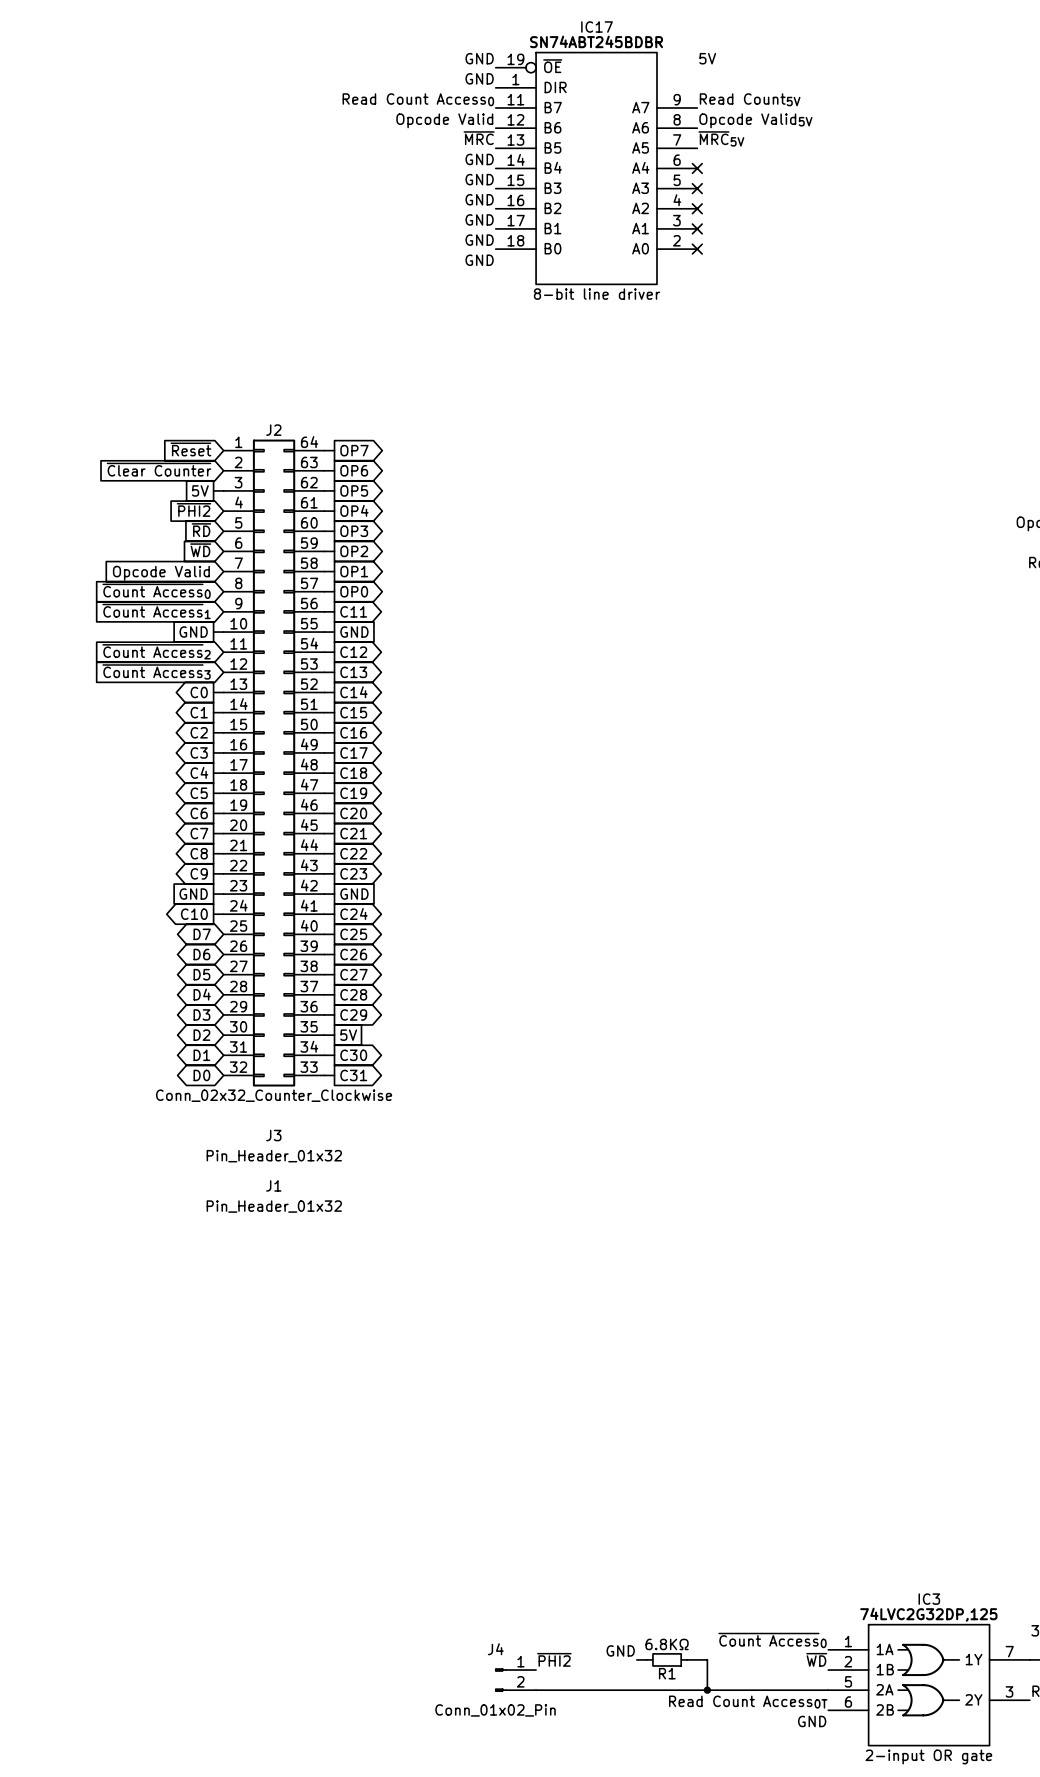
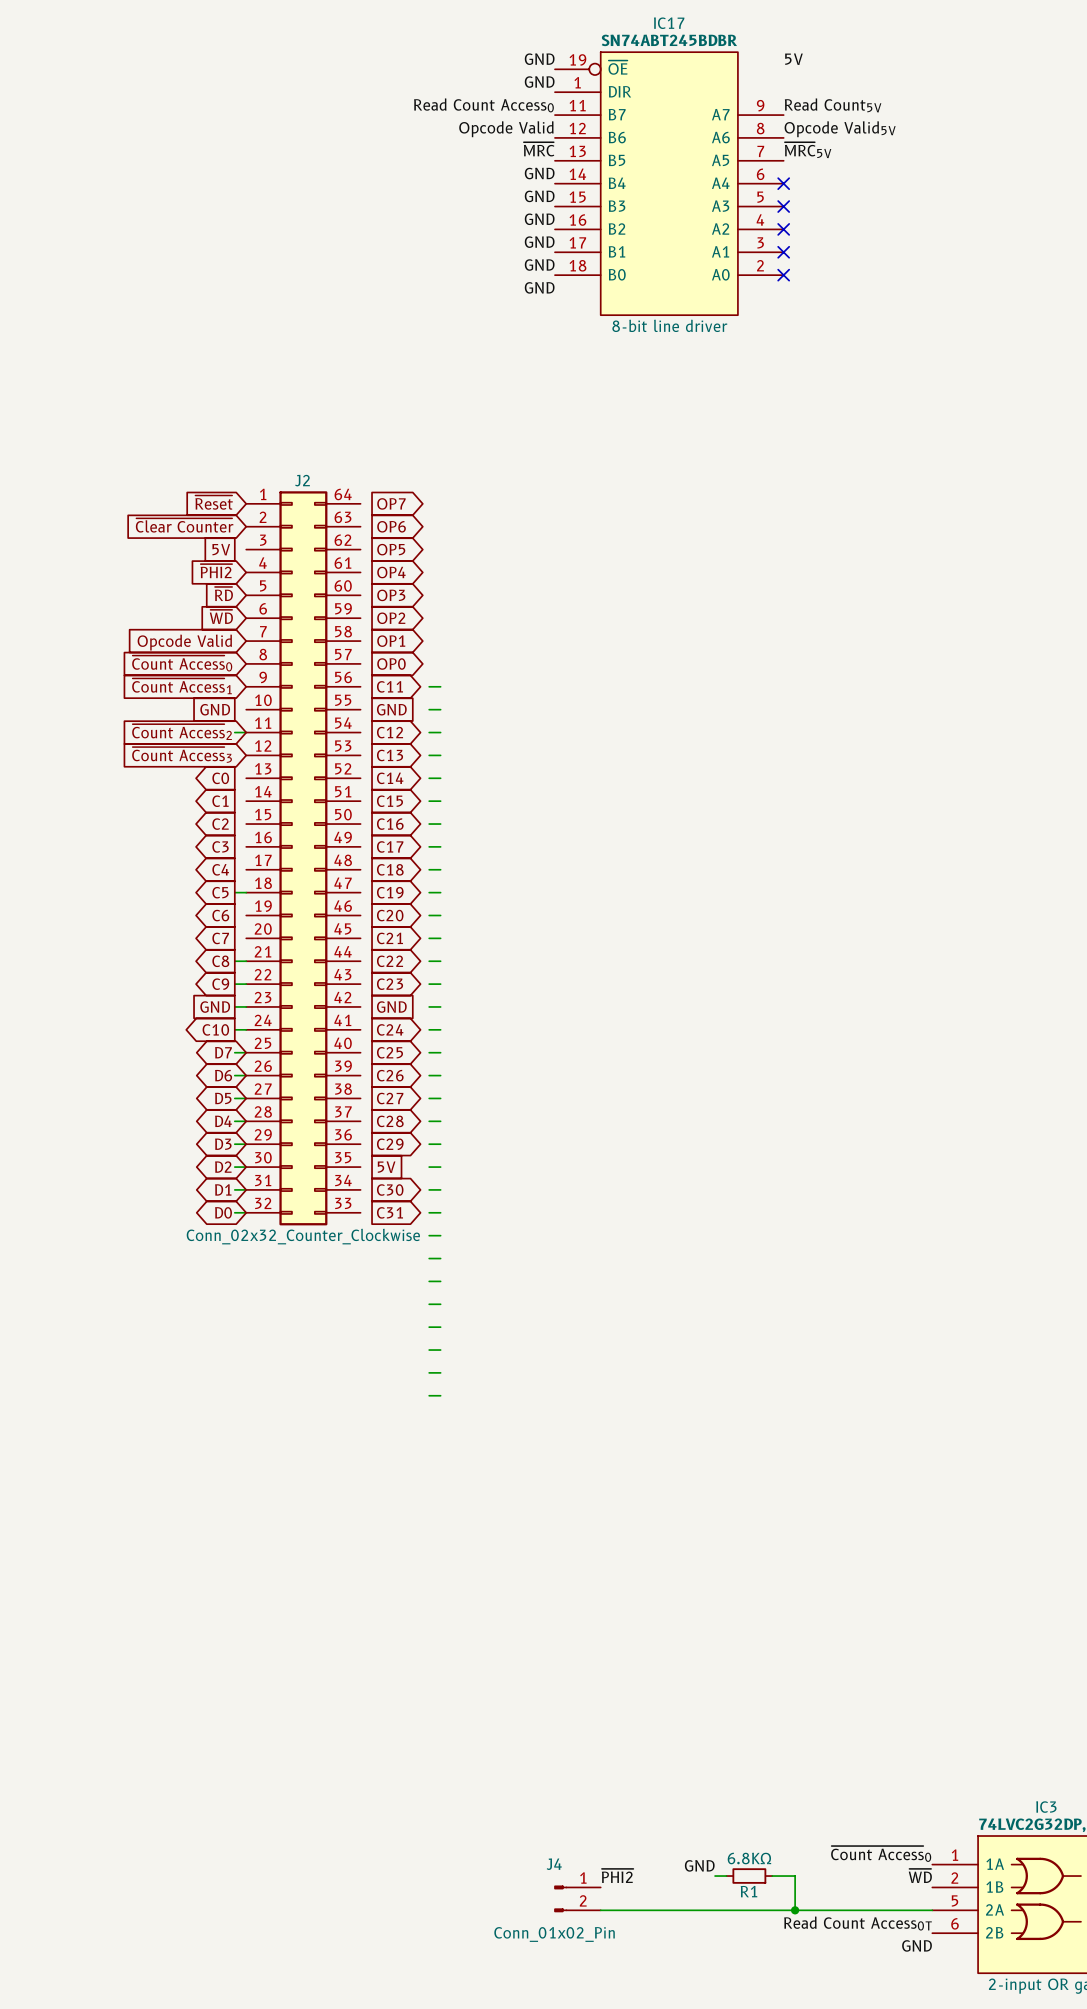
wire: (324, 450) (334, 450) -> (429, 686) (440, 686)
wire: (324, 470) (334, 470) -> (429, 709) (440, 709)
wire: (213, 490) (223, 490) -> (234, 732) (246, 732)
wire: (324, 490) (334, 490) -> (429, 732) (440, 732)
wire: (324, 511) (334, 511) -> (429, 755) (440, 755)
wire: (324, 531) (334, 531) -> (429, 778) (440, 778)
wire: (324, 551) (334, 551) -> (429, 801) (440, 801)
wire: (324, 571) (334, 571) -> (429, 824) (440, 824)
wire: (324, 591) (334, 591) -> (429, 846) (440, 846)
wire: (324, 611) (334, 611) -> (429, 869) (440, 869)
wire: (213, 632) (223, 632) -> none
wire: (324, 632) (334, 632) -> (429, 892) (440, 892)
wire: (324, 652) (334, 652) -> (429, 915) (440, 915)
wire: (324, 672) (334, 672) -> (429, 938) (440, 938)
wire: (213, 692) (223, 692) -> none
wire: (324, 692) (334, 692) -> (429, 961) (440, 961)
wire: (213, 712) (223, 712) -> none
wire: (324, 712) (334, 712) -> (429, 984) (440, 984)
wire: (213, 732) (223, 732) -> none
wire: (324, 732) (334, 732) -> (429, 1006) (440, 1006)
wire: (213, 752) (223, 752) -> none
wire: (324, 752) (334, 752) -> (429, 1029) (440, 1029)
wire: (213, 773) (223, 773) -> (234, 1052) (246, 1052)
wire: (324, 773) (334, 773) -> (429, 1052) (440, 1052)
wire: (324, 793) (334, 793) -> (429, 1075) (440, 1075)
wire: (213, 813) (223, 813) -> (234, 1098) (246, 1098)
wire: (324, 813) (334, 813) -> (429, 1098) (440, 1098)
wire: (213, 833) (223, 833) -> (234, 1121) (246, 1121)
wire: (324, 833) (334, 833) -> (429, 1121) (440, 1121)
wire: (324, 853) (334, 853) -> (429, 1144) (440, 1144)
wire: (324, 873) (334, 873) -> (429, 1167) (440, 1167)
wire: (324, 894) (334, 894) -> (429, 1189) (440, 1189)
wire: (324, 914) (334, 914) -> (429, 1212) (440, 1212)
wire: (324, 934) (334, 934) -> (429, 1235) (440, 1235)
wire: none -> (234, 1075) (246, 1075)
wire: (324, 954) (334, 954) -> (429, 1258) (440, 1258)
wire: (324, 974) (334, 974) -> (429, 1281) (440, 1281)
wire: (324, 994) (334, 994) -> (429, 1304) (440, 1304)
wire: none -> (234, 1144) (246, 1144)
wire: (324, 1014) (334, 1014) -> (429, 1327) (440, 1327)
wire: none -> (234, 1167) (246, 1167)
wire: (324, 1035) (334, 1035) -> (429, 1350) (440, 1350)
wire: none -> (234, 1189) (246, 1189)
wire: (324, 1055) (334, 1055) -> (429, 1372) (440, 1372)
wire: none -> (234, 1212) (246, 1212)
wire: (324, 1075) (334, 1075) -> (429, 1395) (440, 1395)
J3: Pin_Header_01x32 (274, 1146) -> none
J1: Pin_Header_01x32 (274, 1196) -> none

